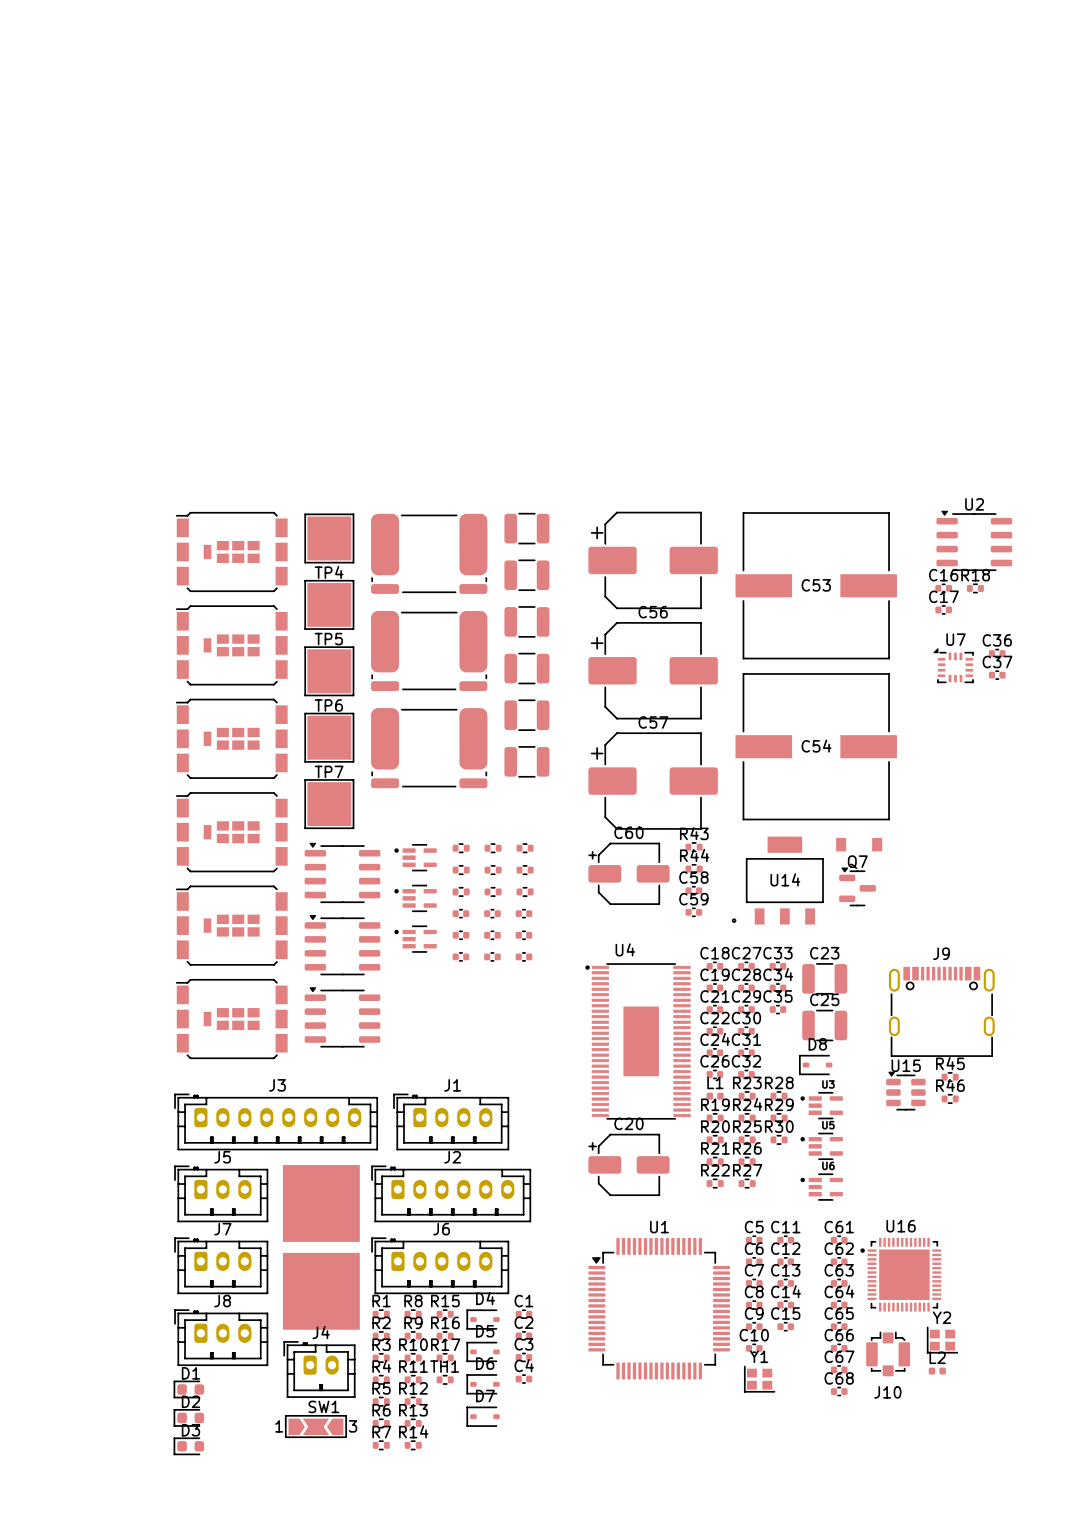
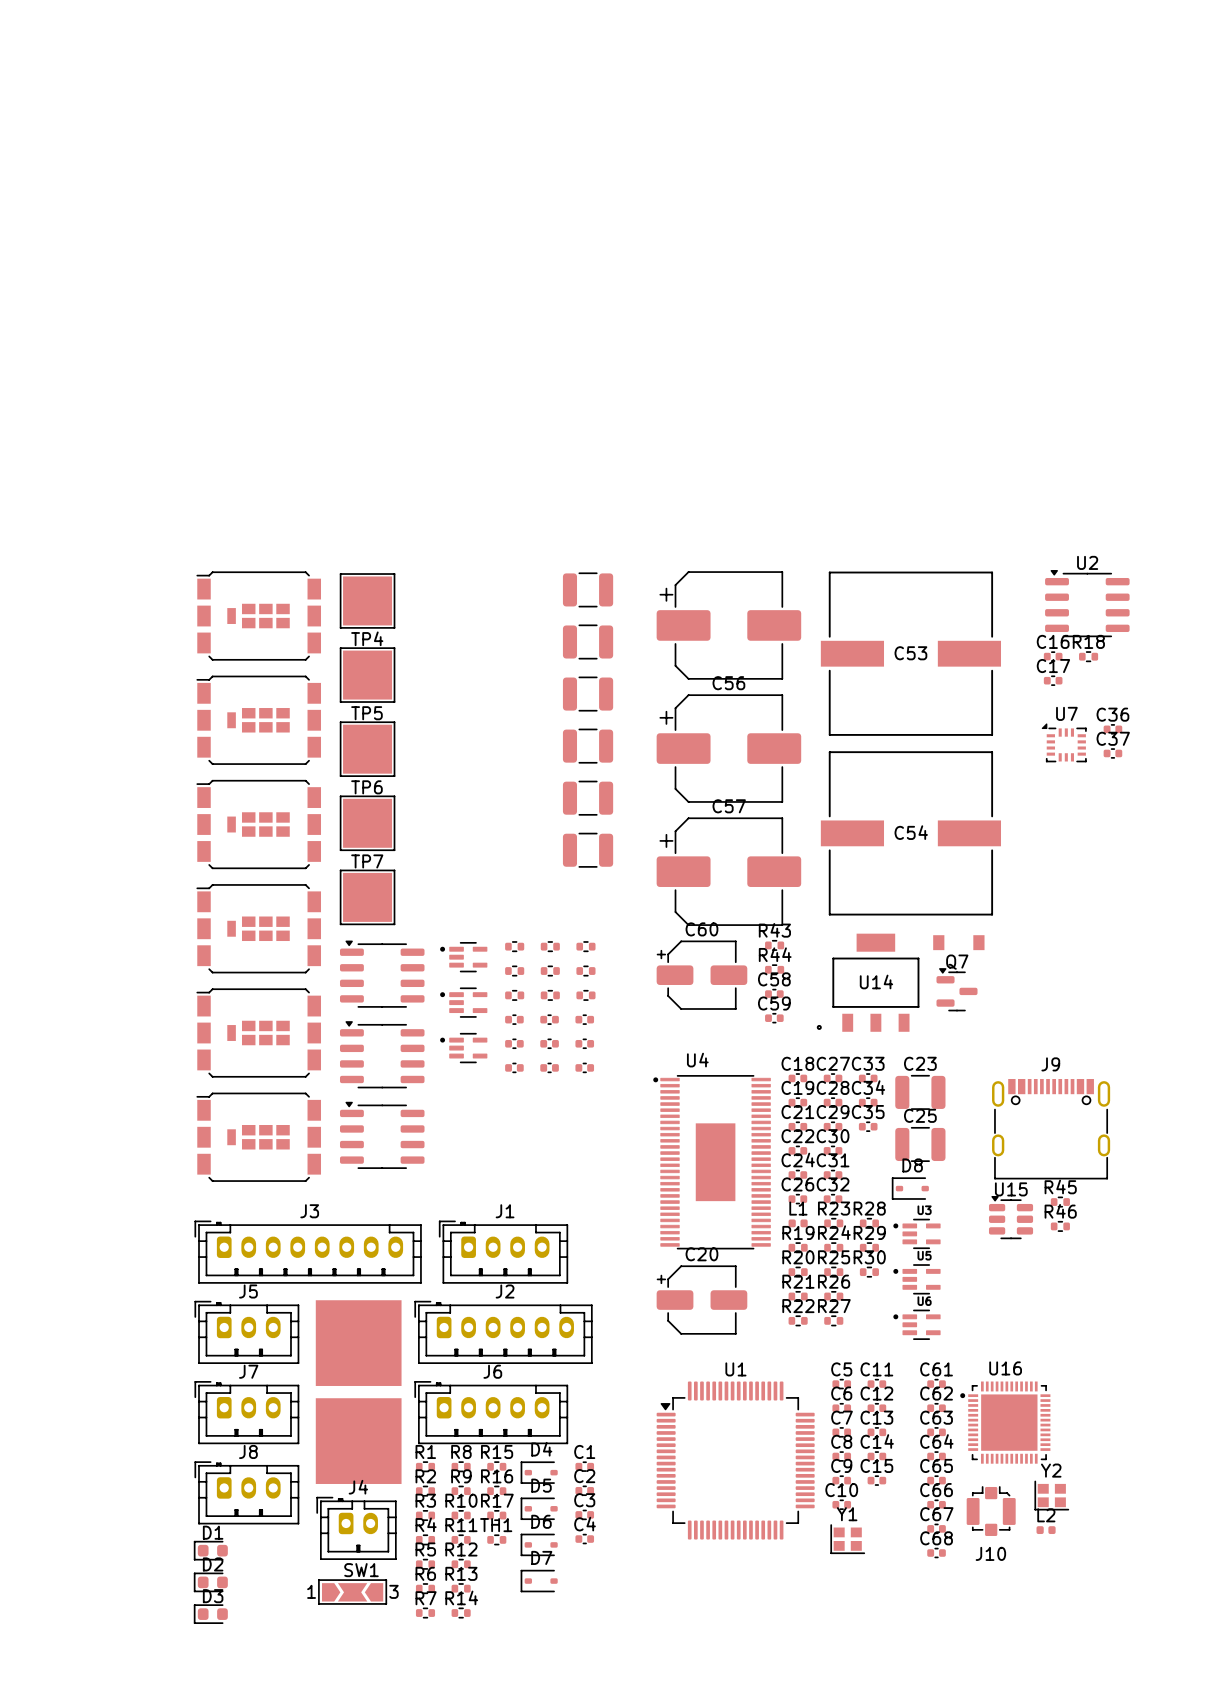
part: (429, 553) -> none
part: (429, 650) -> none
part: (429, 748) -> none

